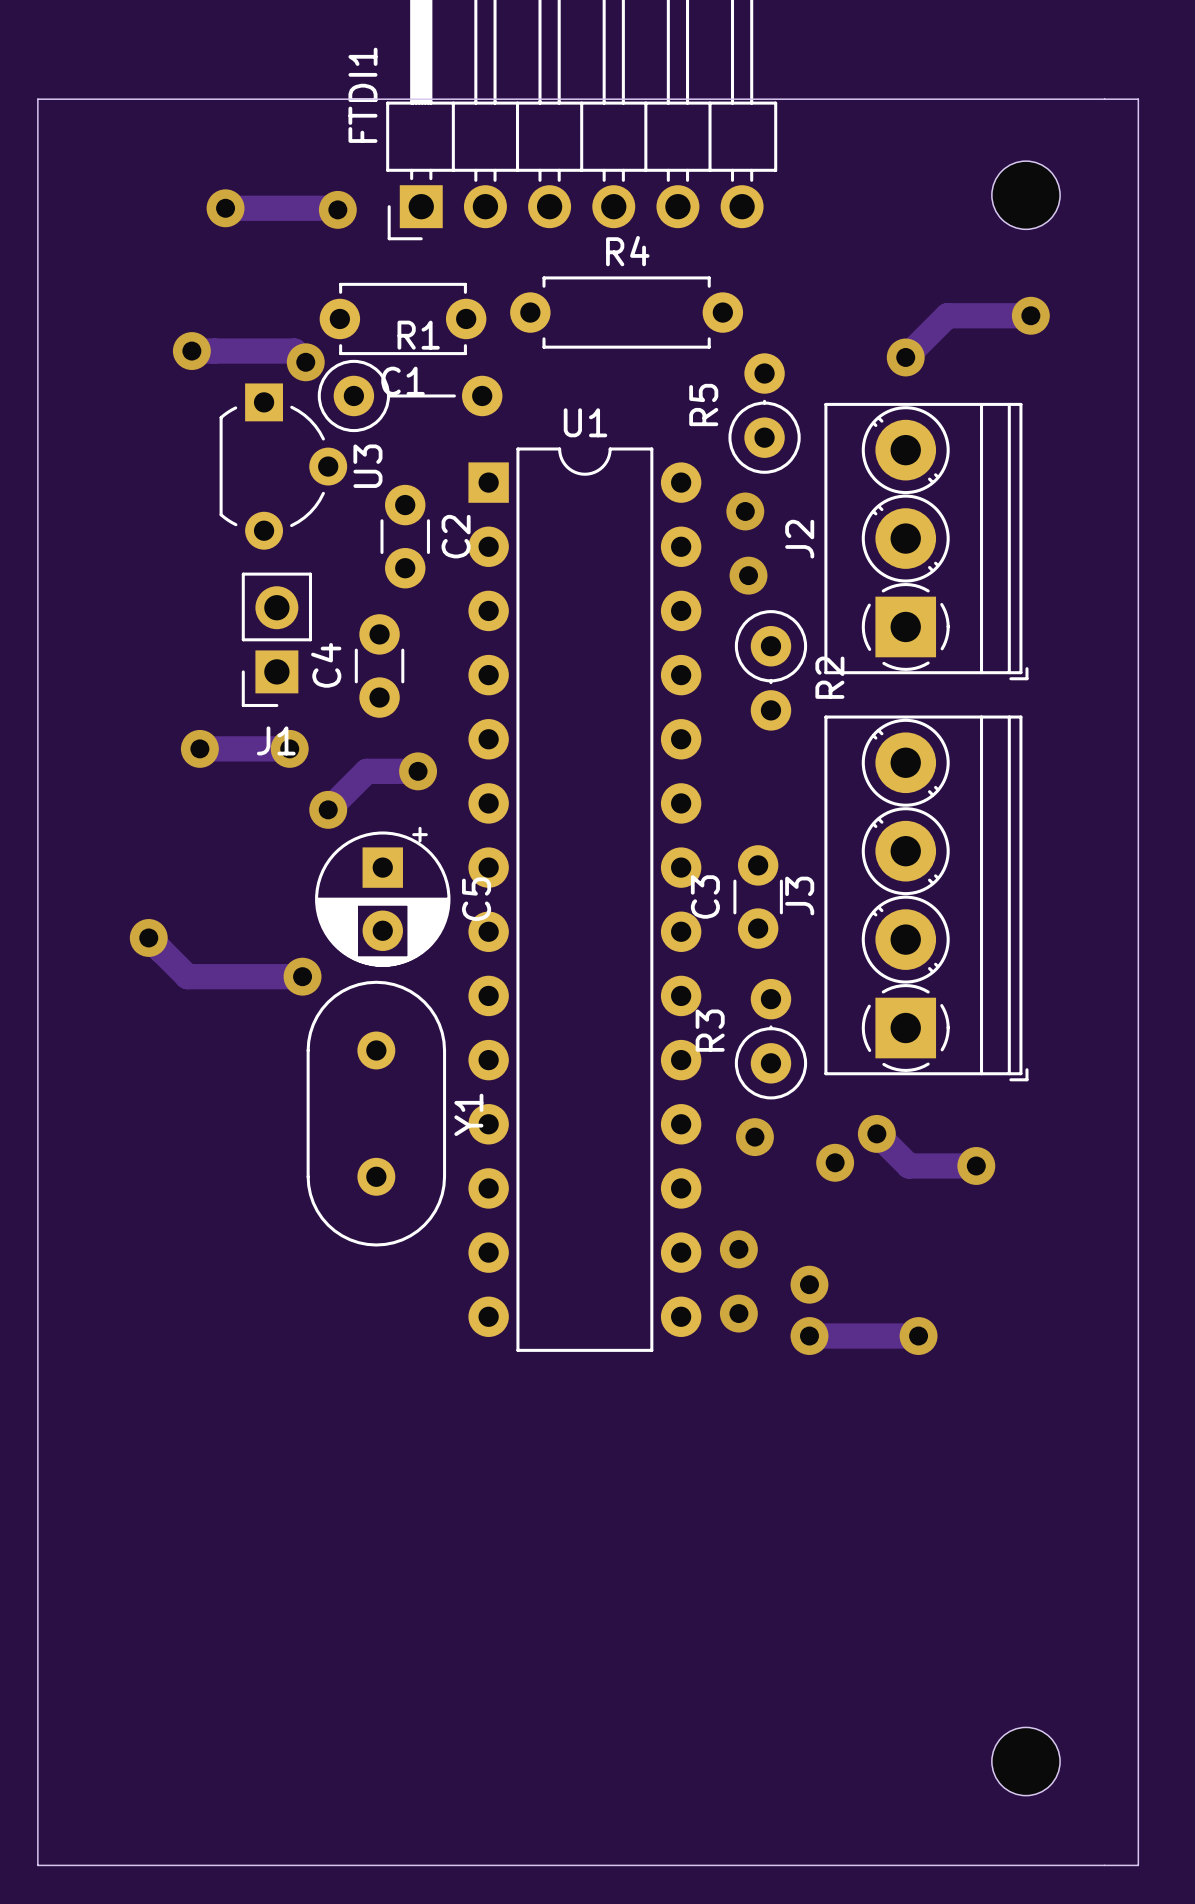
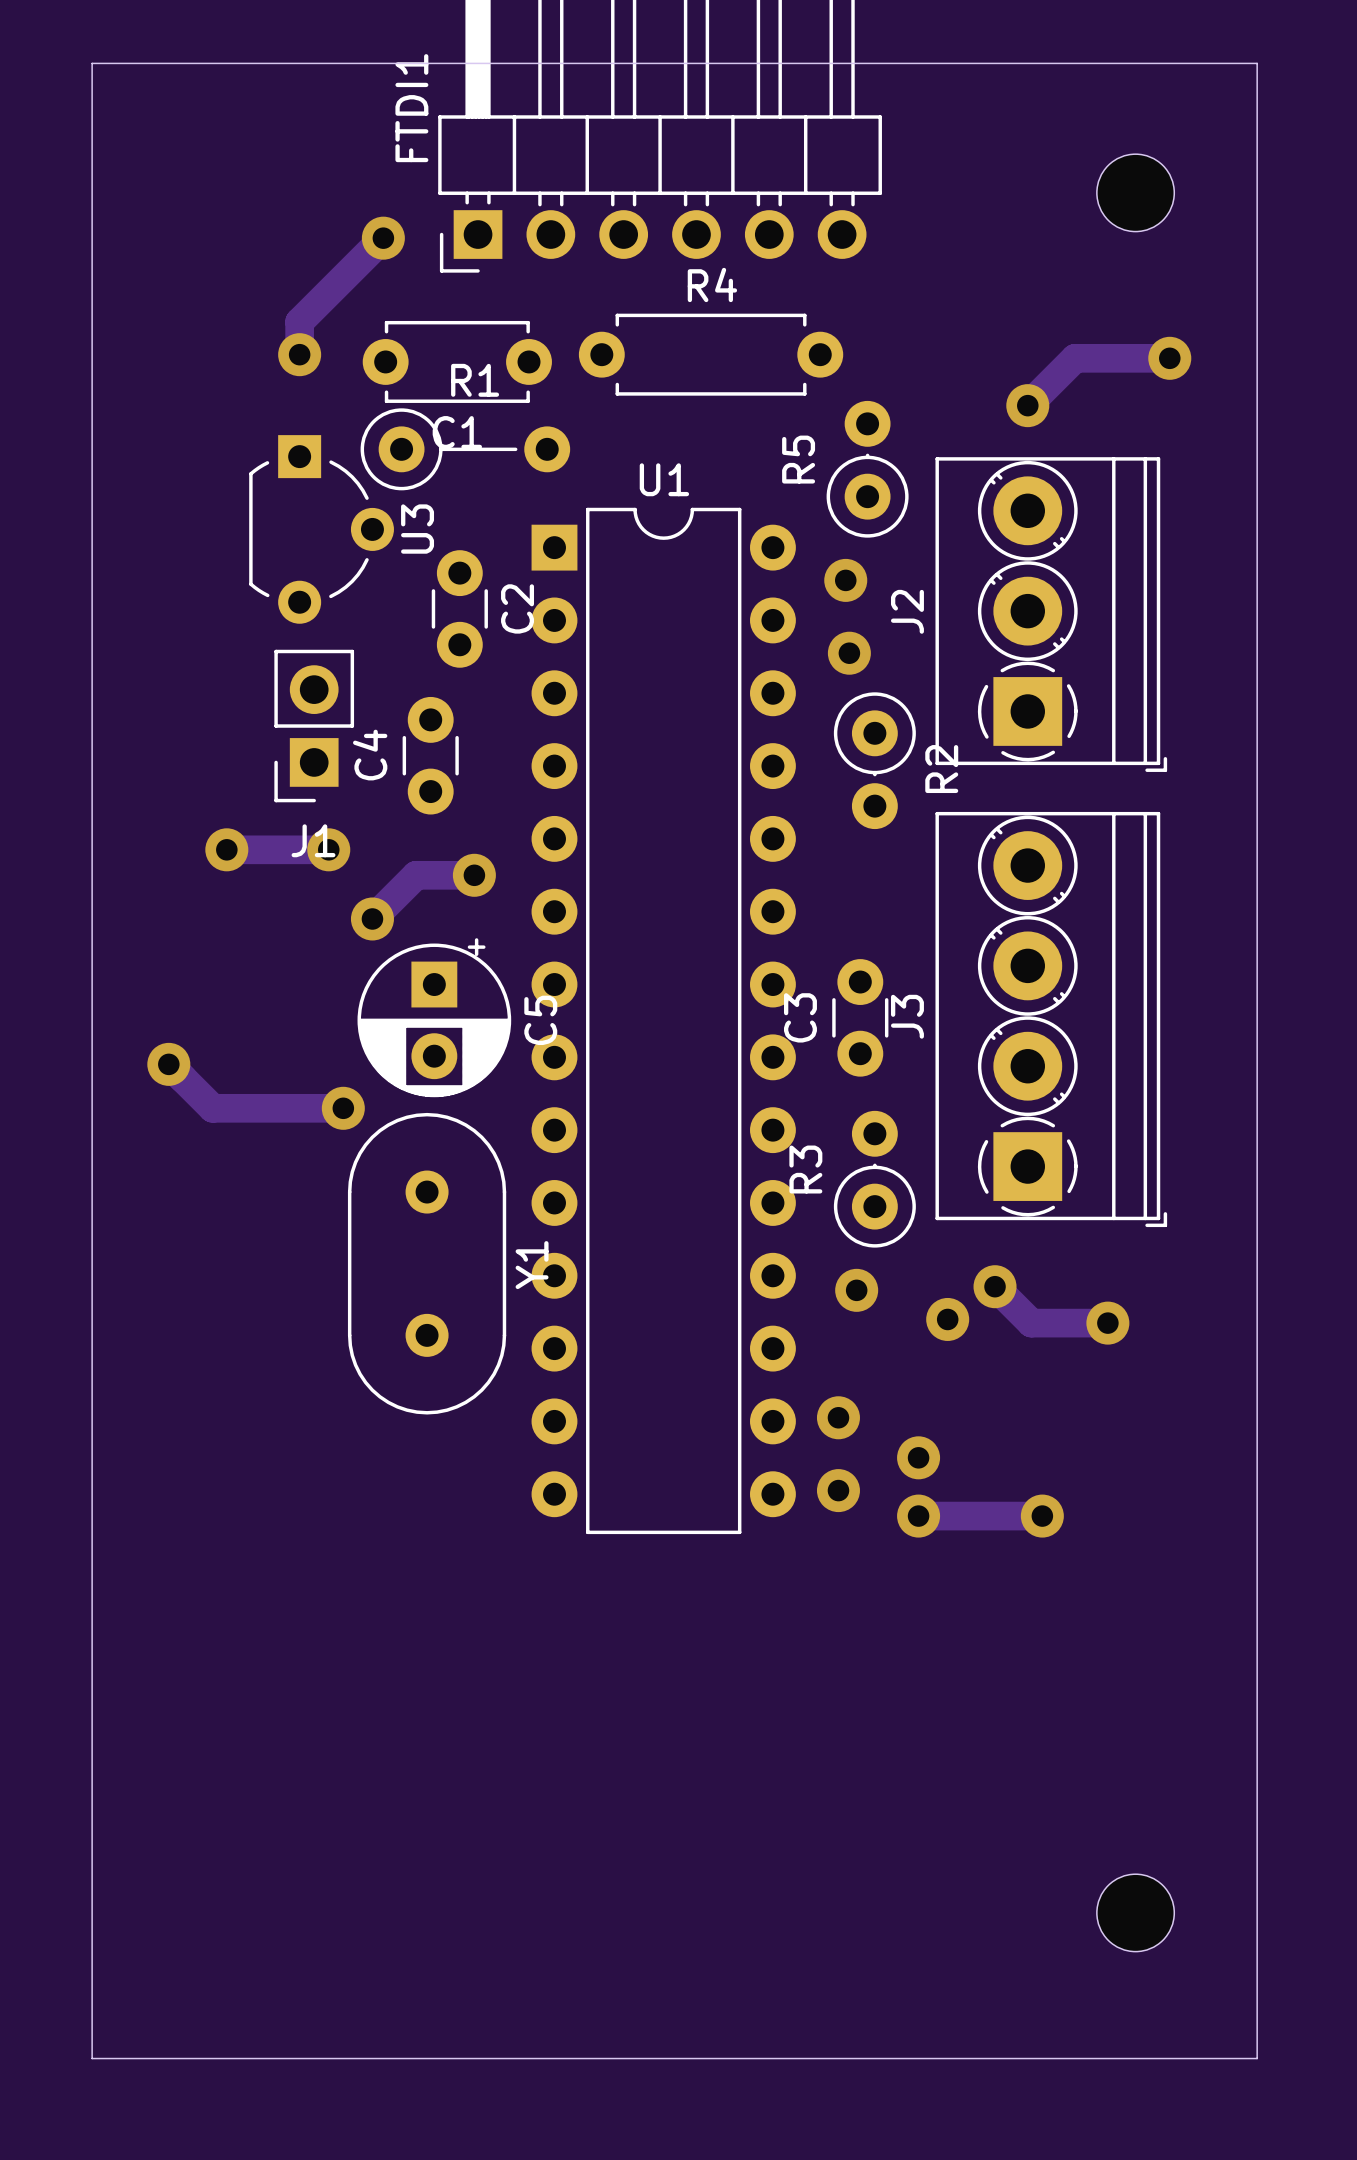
board edge: (37, 99) (1138, 99) (1138, 1865) (37, 1865) (37, 99) -> (92, 63) (92, 2058) (1257, 2058) (1257, 63) (92, 63)
part position: (1025, 195) -> (1135, 192)
track: (225, 208) (336, 208) (337, 209) -> (299, 354) (299, 321) (383, 238)
via: (225, 208) -> none
via: none -> (299, 354)
track: (191, 351) (294, 351) (305, 362) -> none
via: (191, 351) -> none
via: (305, 362) -> none
part position: (1025, 1761) -> (1135, 1912)

